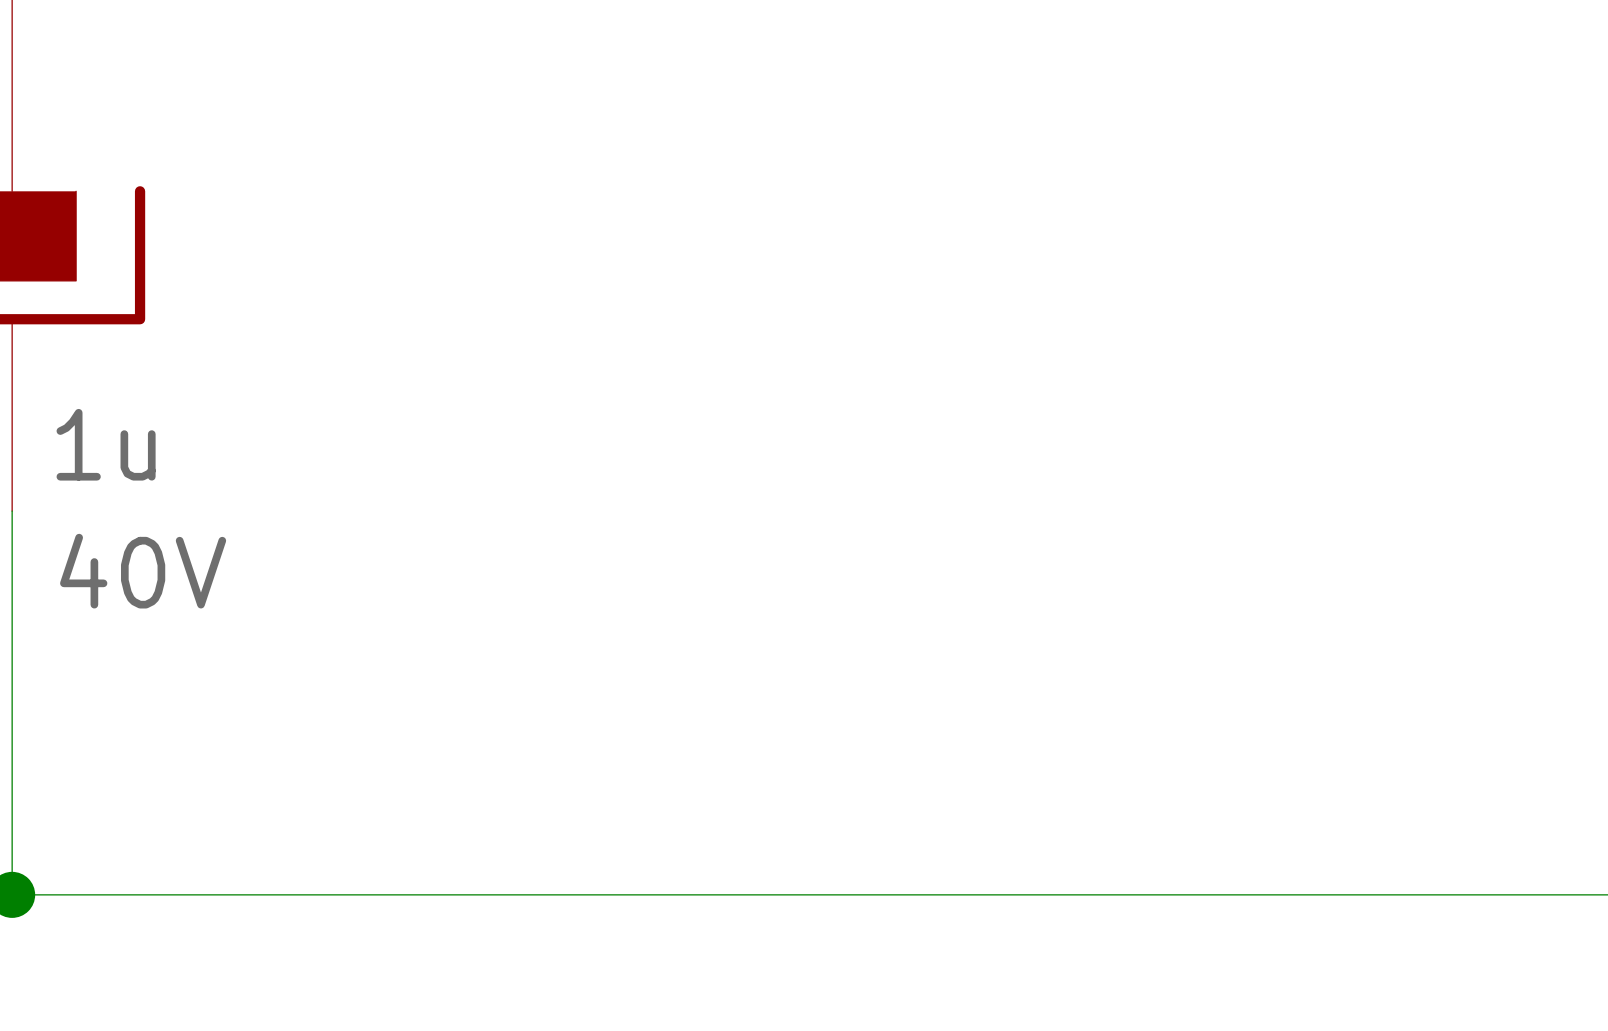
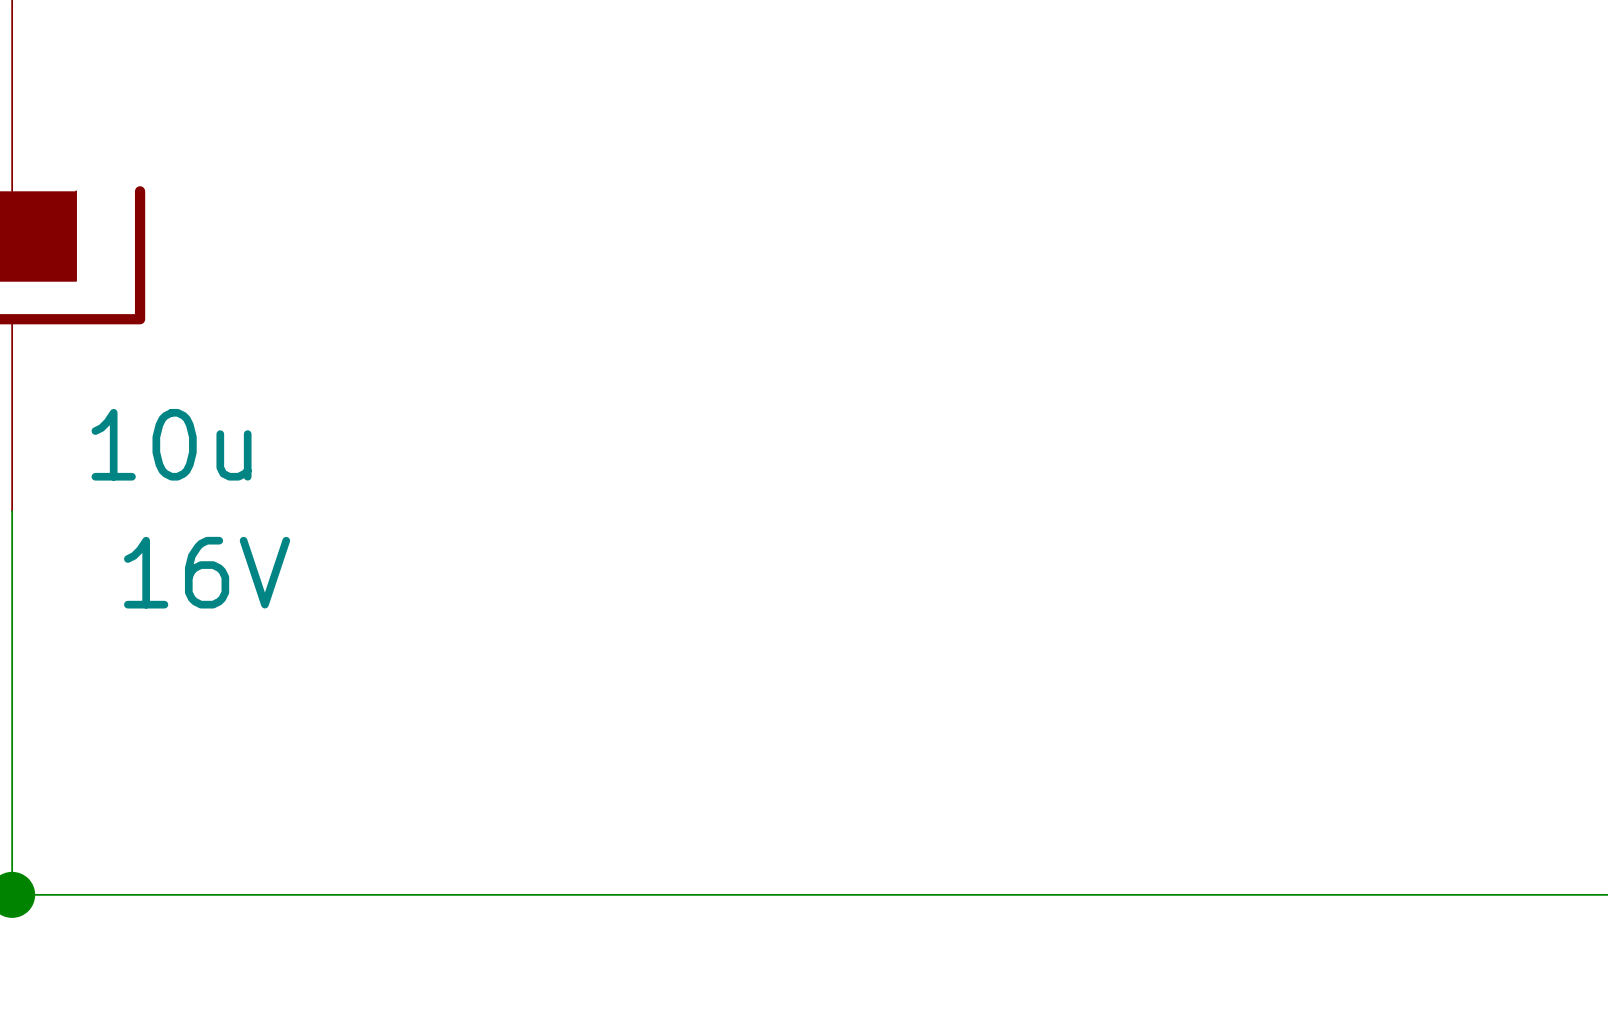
part value: 1u (106, 444) -> 10u (171, 444)
part text: 40V (143, 571) -> 16V (207, 572)

